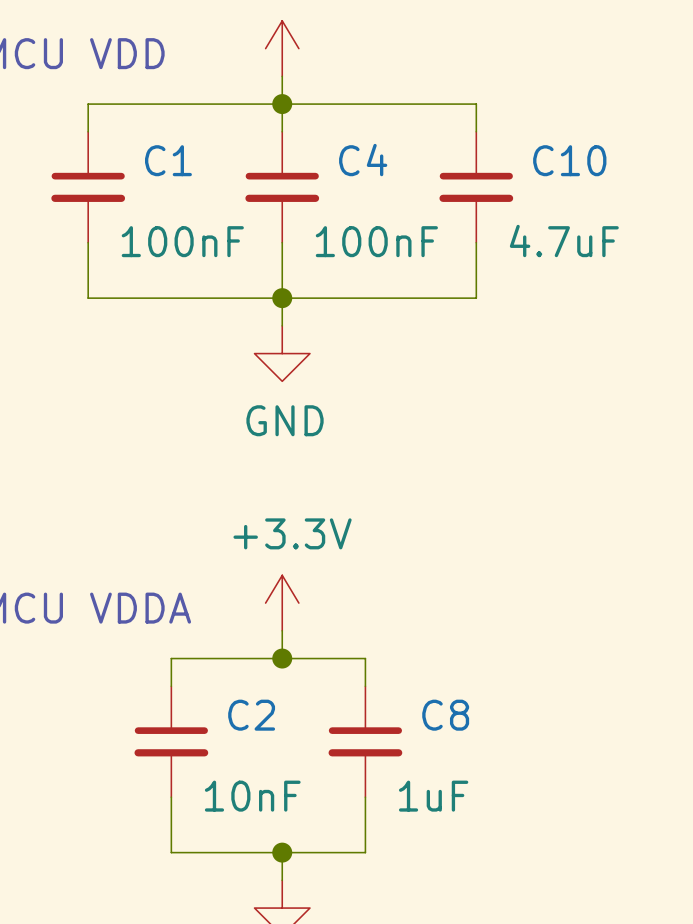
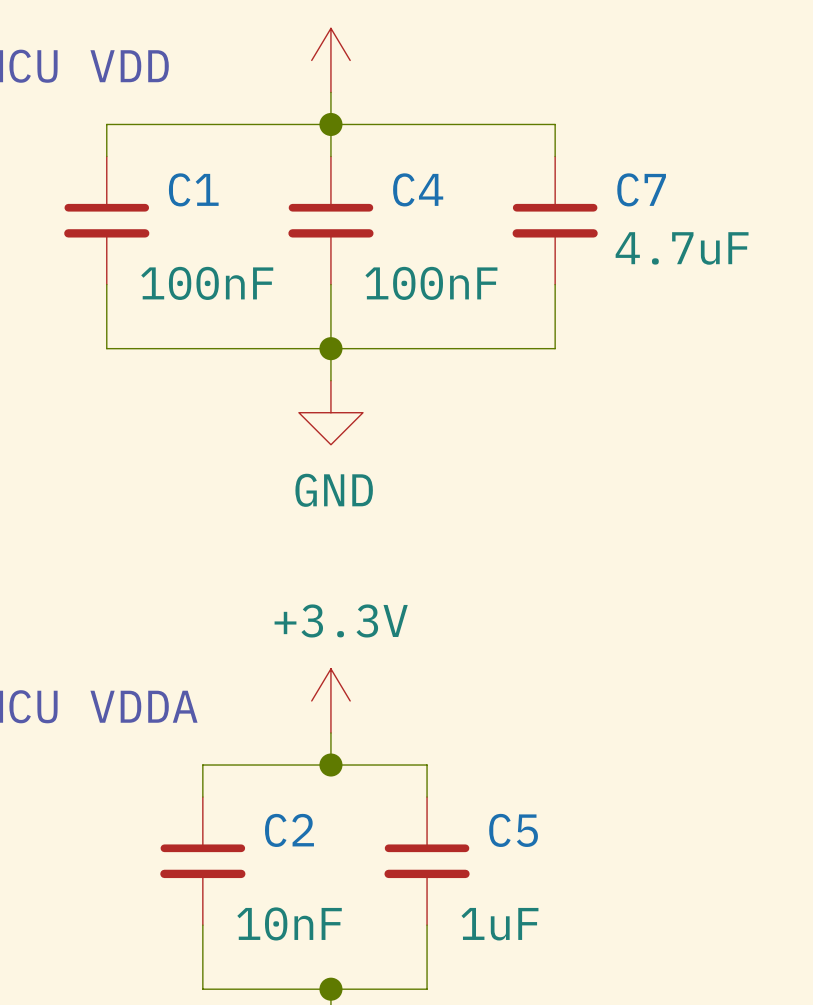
C10 name: C10 (569, 160) -> C7 (641, 189)
C10 value position: 4.7uF (564, 241) -> 4.7uF (682, 248)
C8 name: C8 (445, 715) -> C5 (513, 830)

